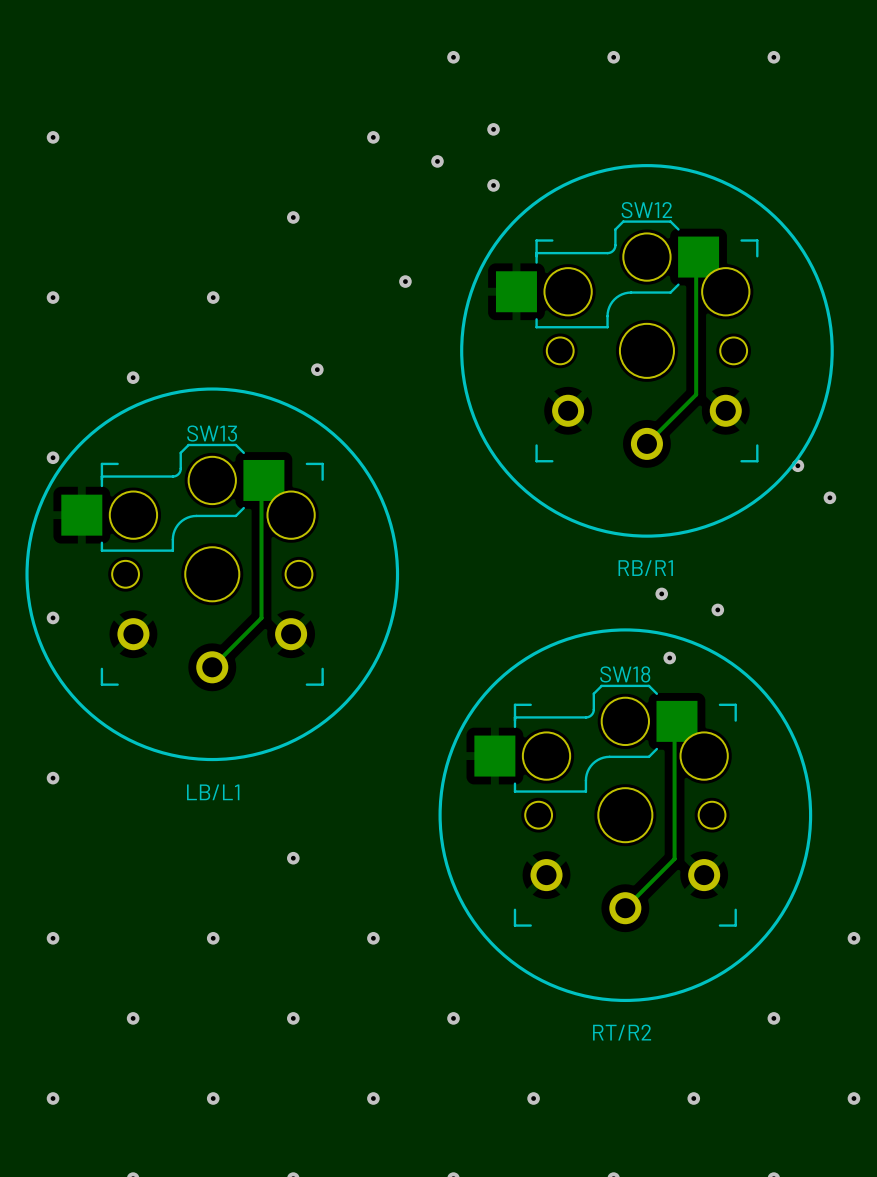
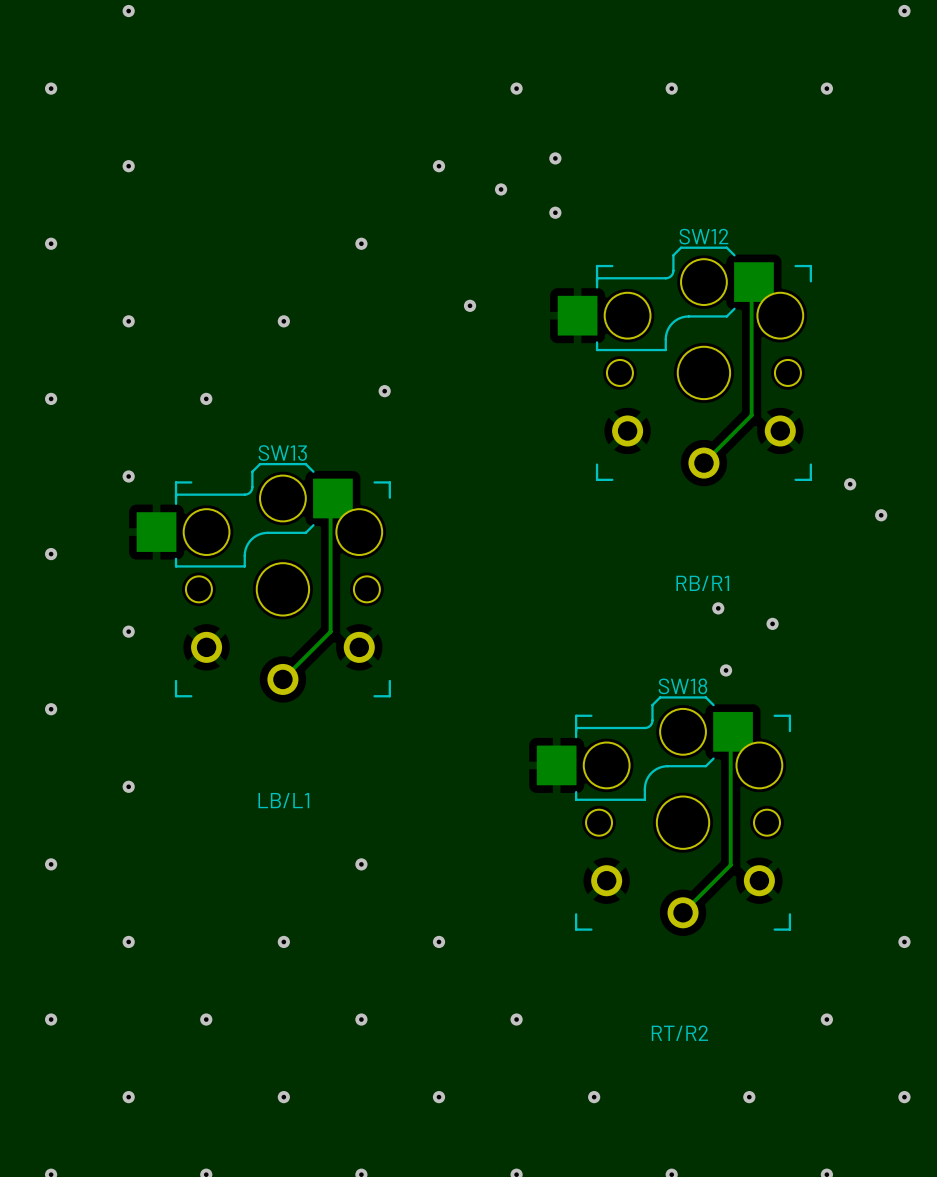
drawing: [460, 164, 834, 538] -> none
drawing: [25, 387, 400, 762] -> none
drawing: [438, 628, 813, 1003] -> none

